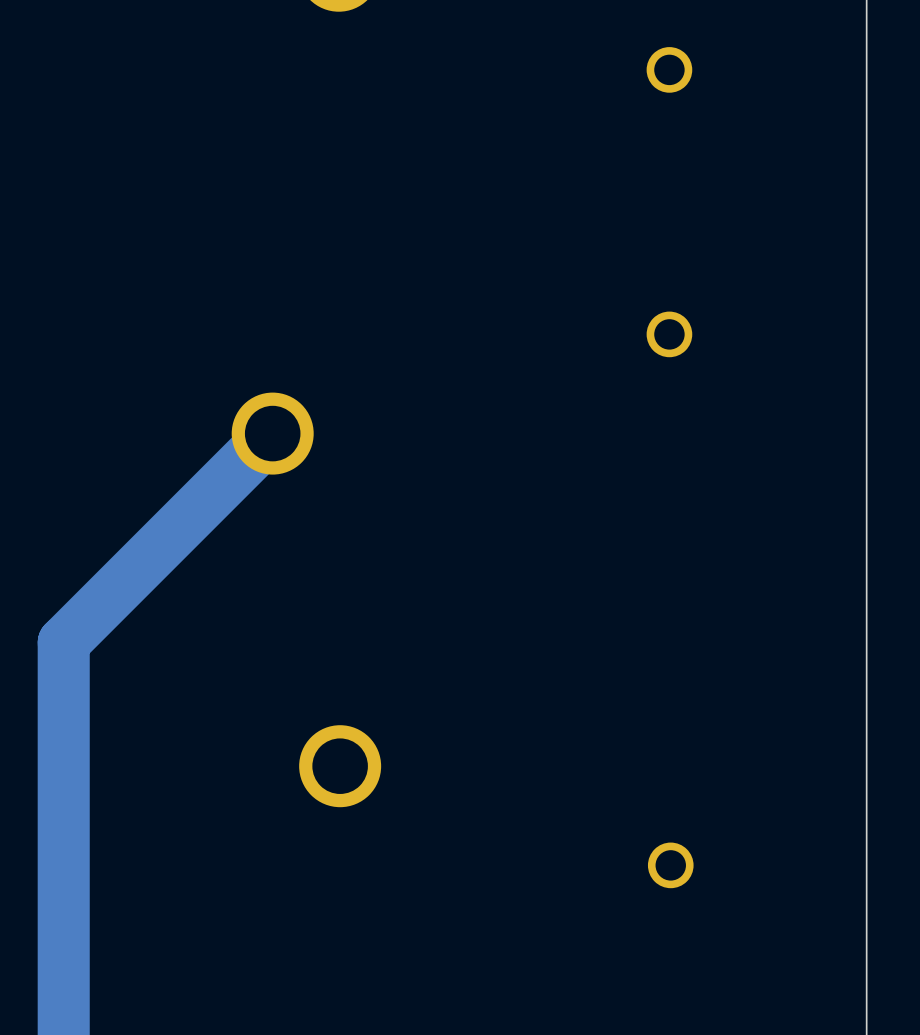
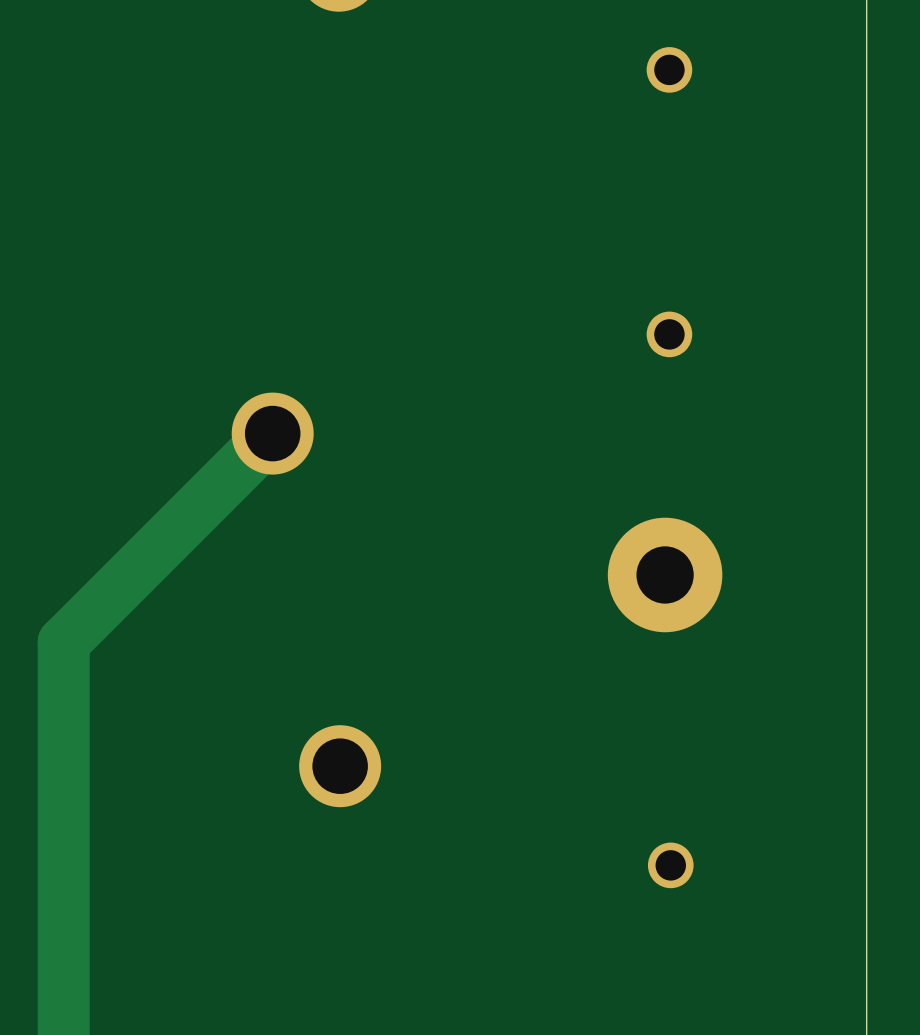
part: none -> (665, 574)

